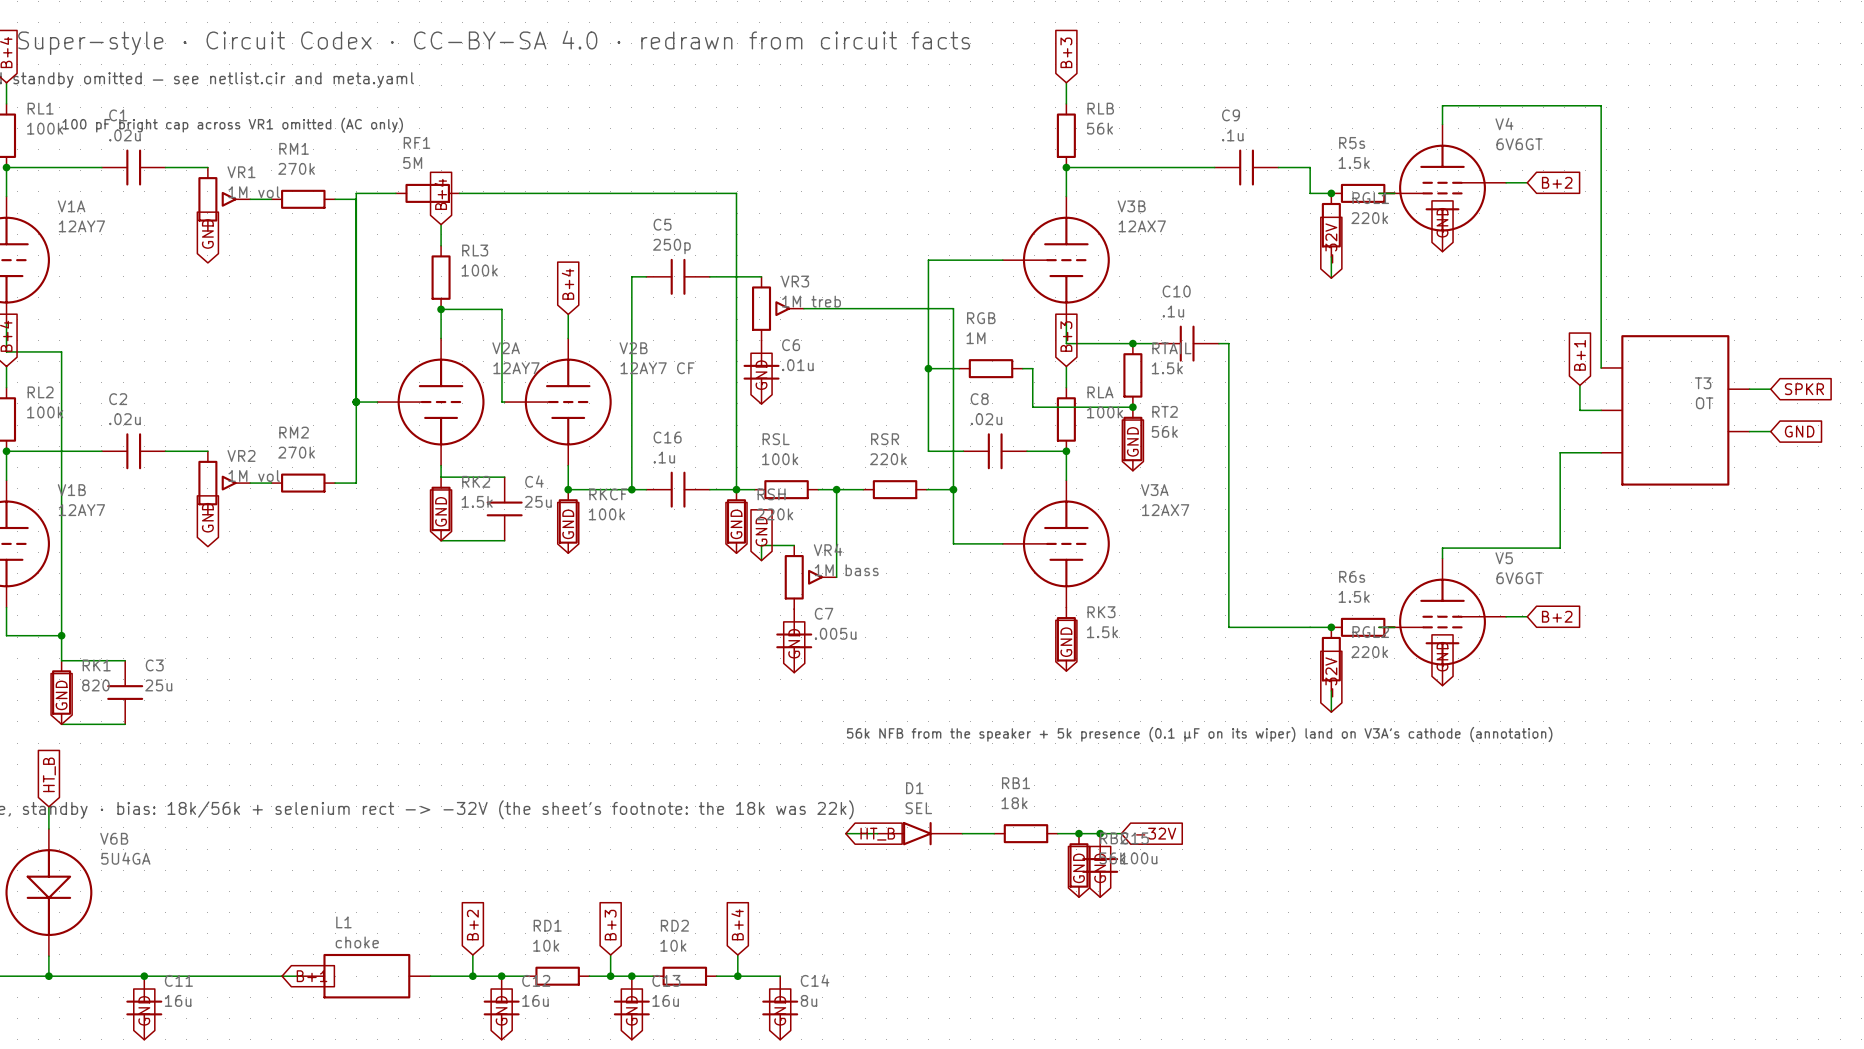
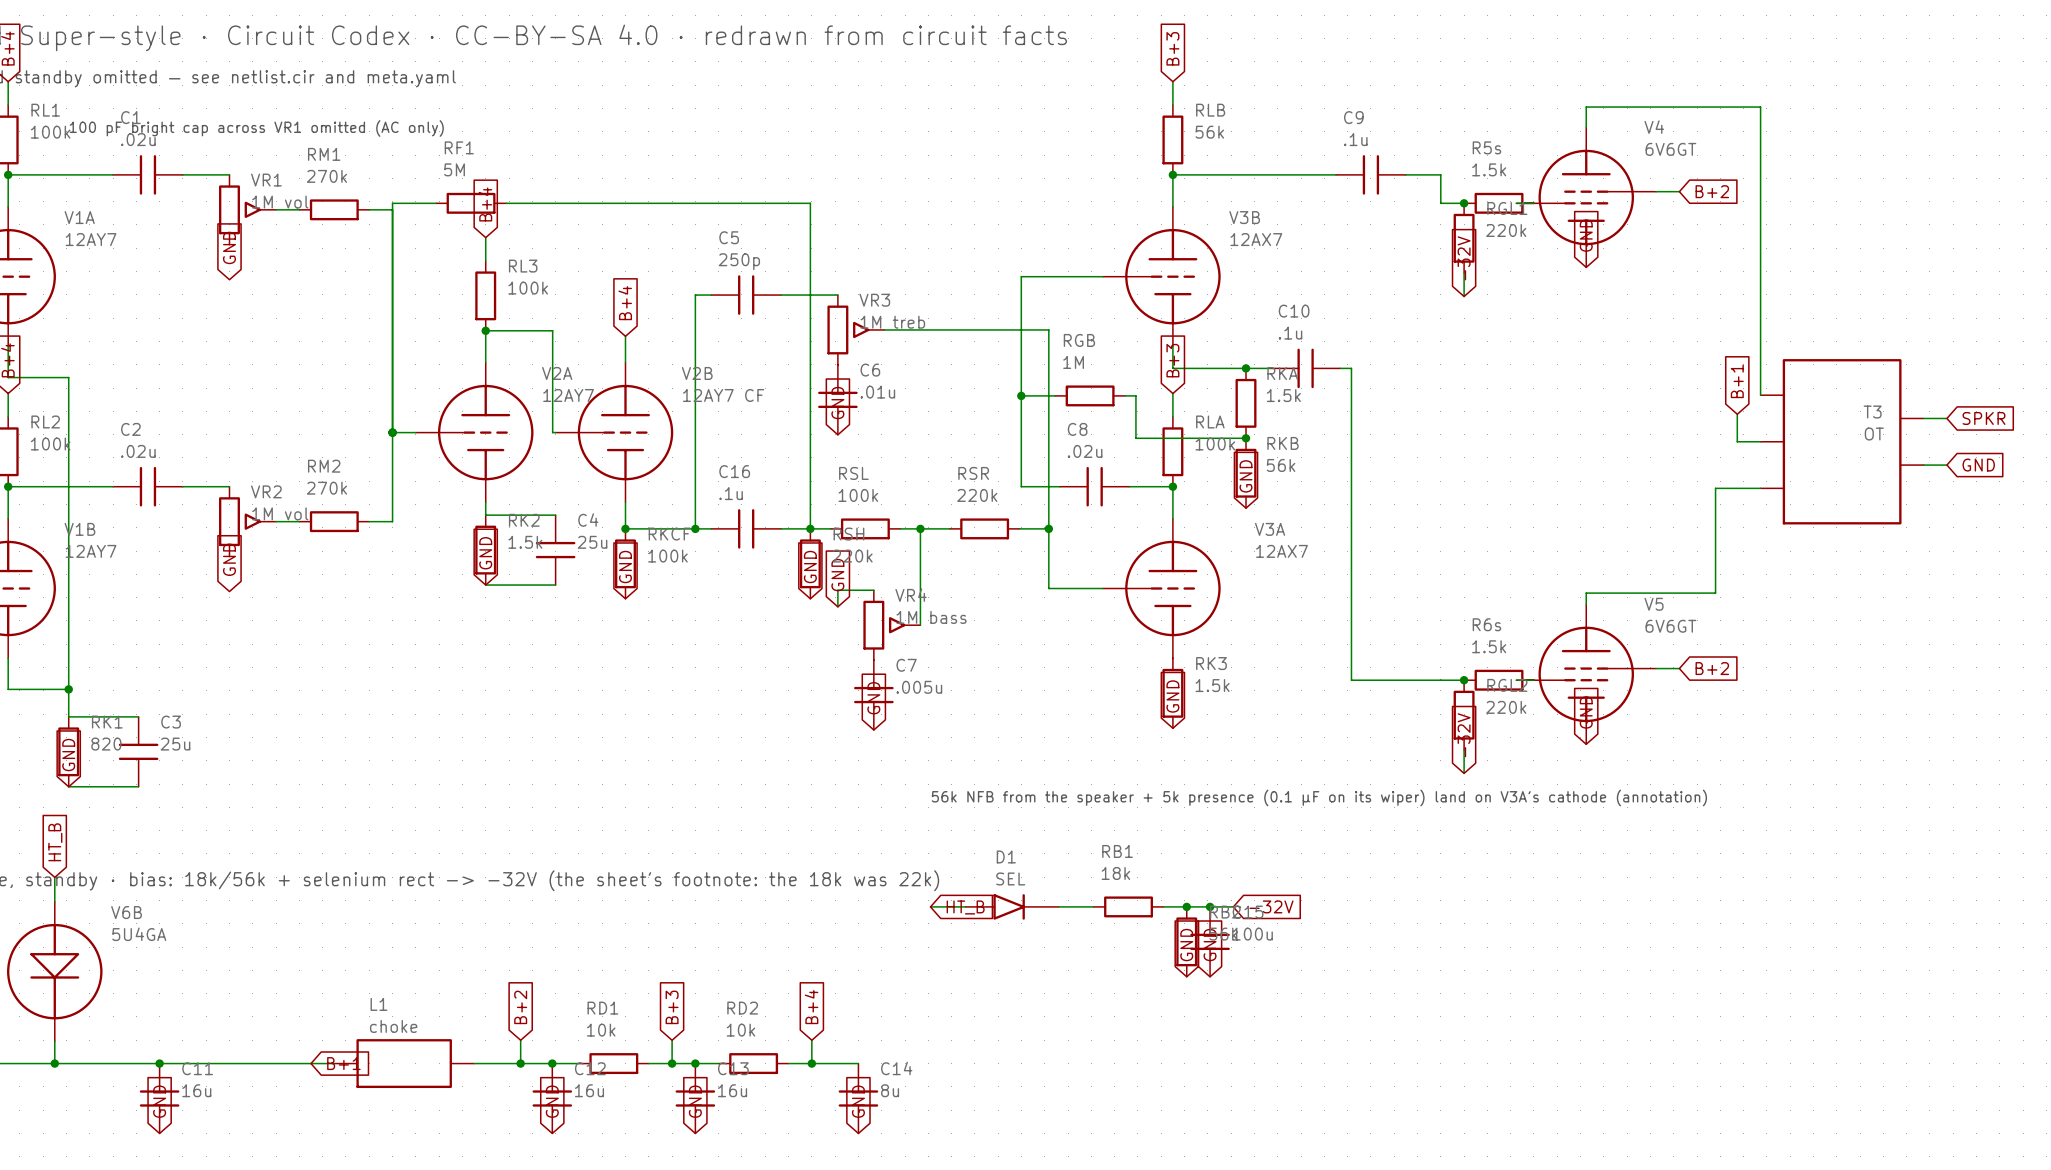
RTAIL name: RTAIL (1171, 348) -> RKA (1282, 373)
RT2 name: RT2 (1165, 411) -> RKB (1283, 443)

